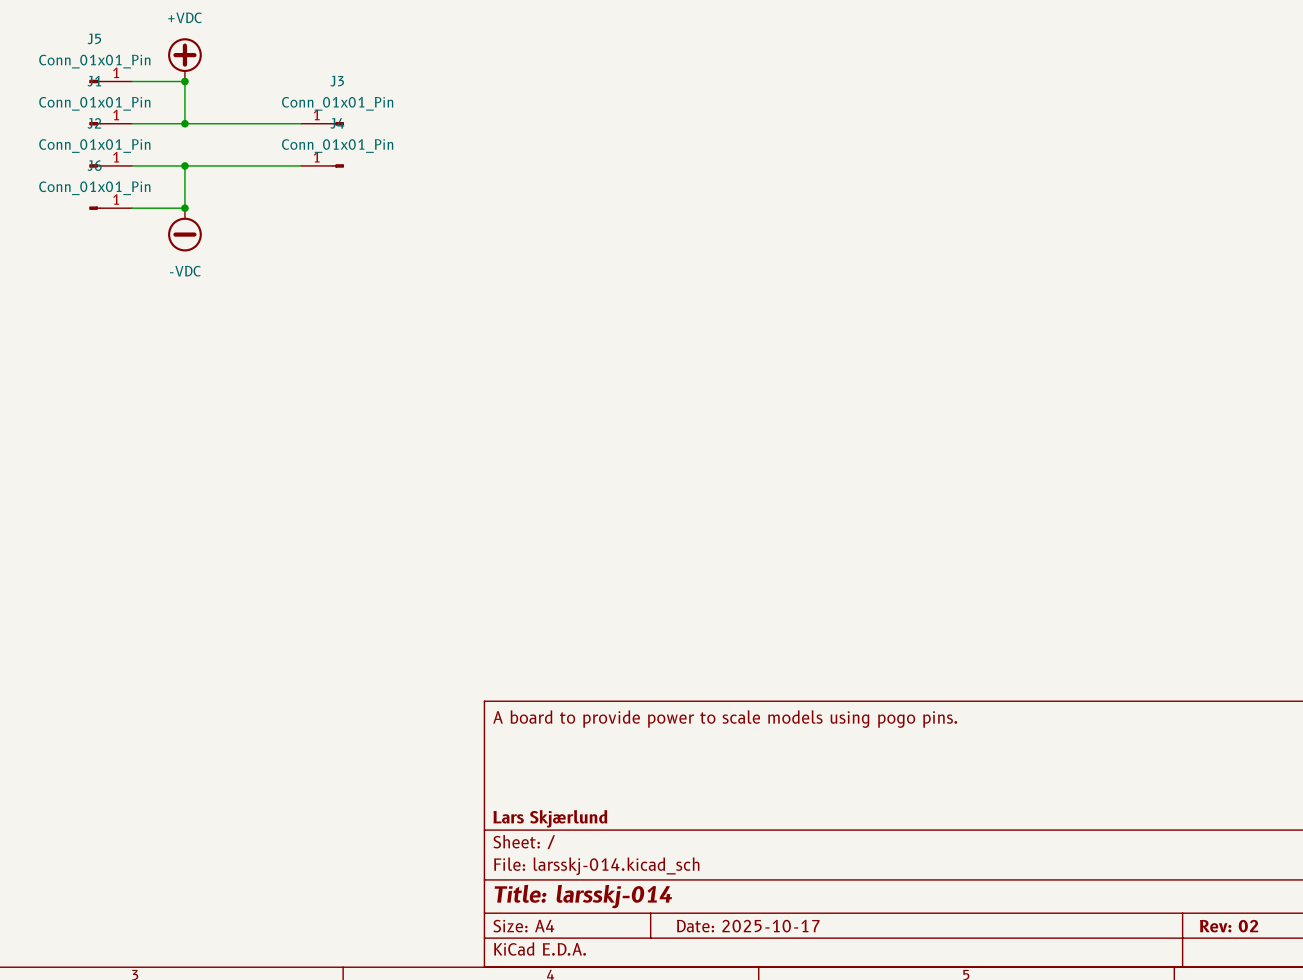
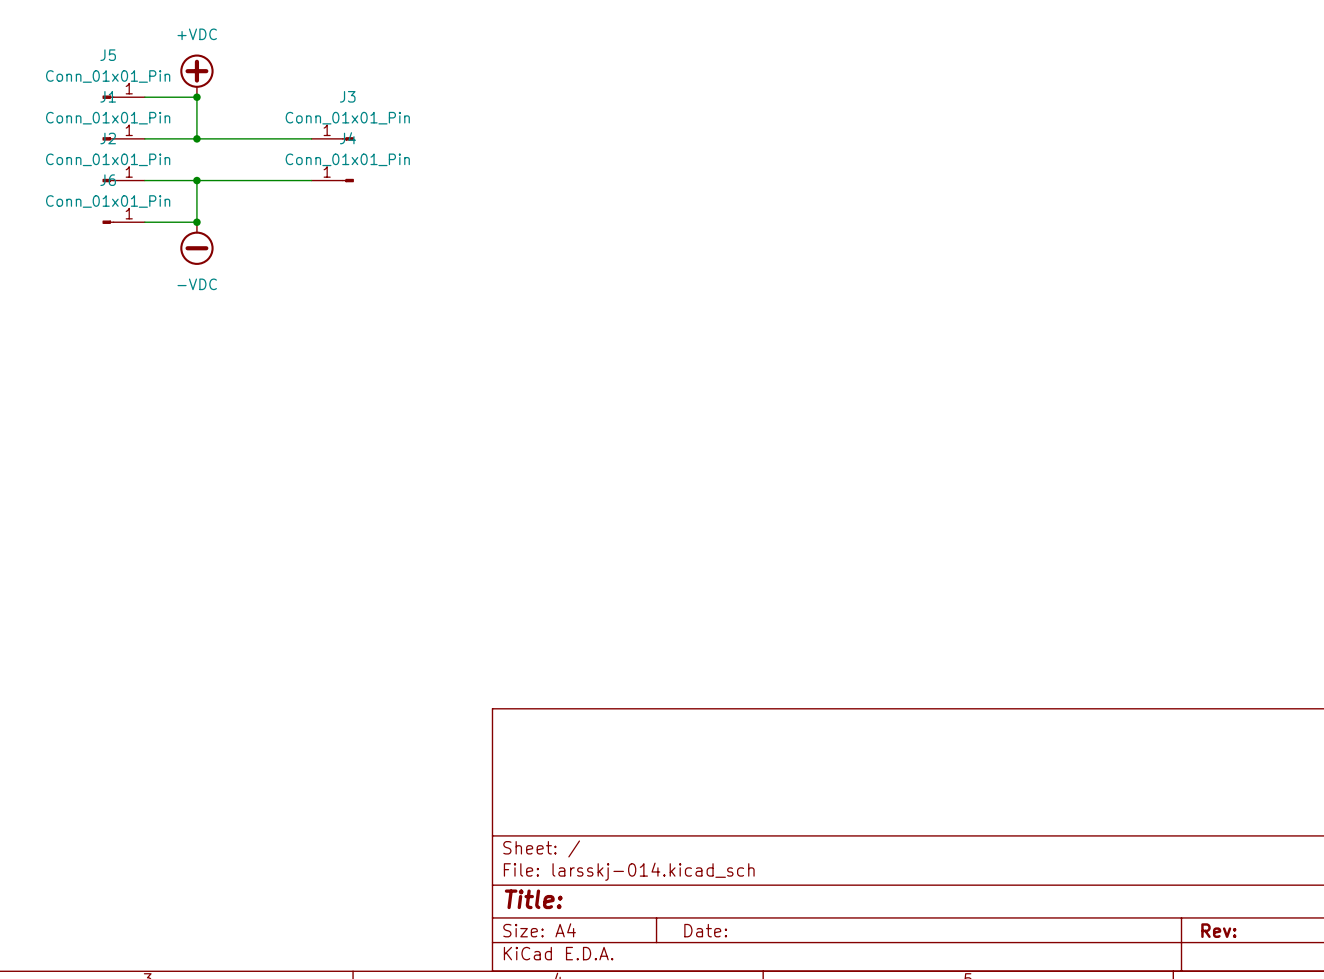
title block: A board to provide power to scale models using pogo pins. (725, 719) -> none
title block: Lars Skjærlund (550, 818) -> none
title block: Title: larsskj-014 (583, 896) -> Title: (533, 899)
title block: Date: 2025-10-17 (748, 926) -> Date: (705, 930)
title block: Rev: 02 (1229, 926) -> Rev: (1218, 930)

